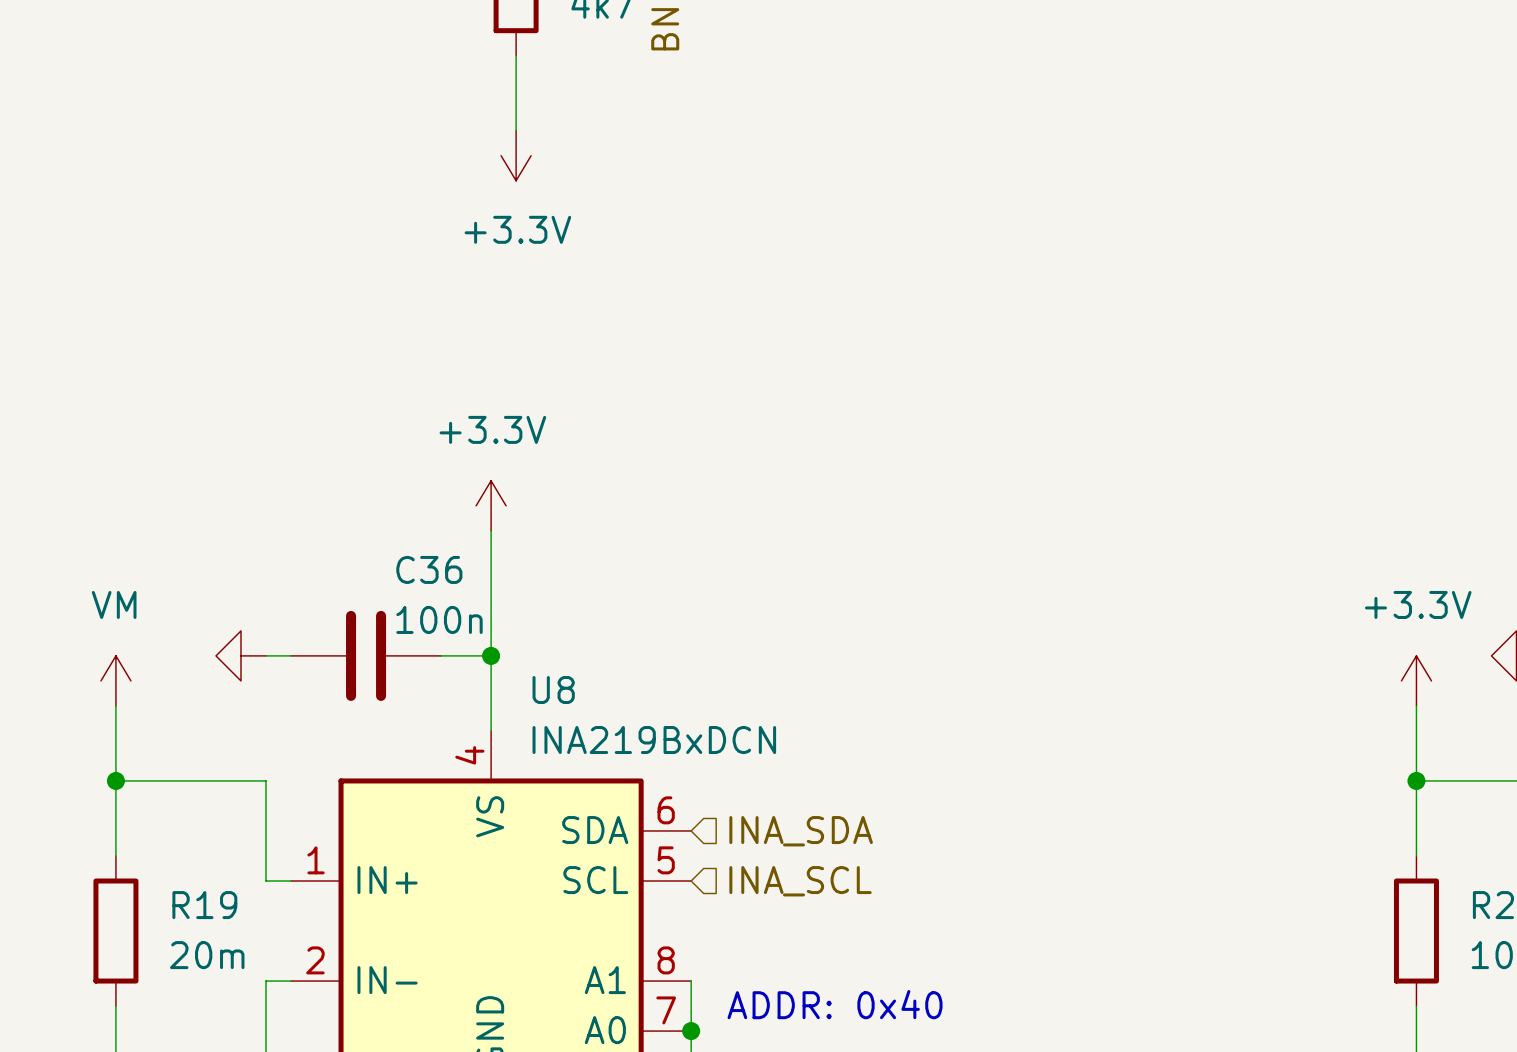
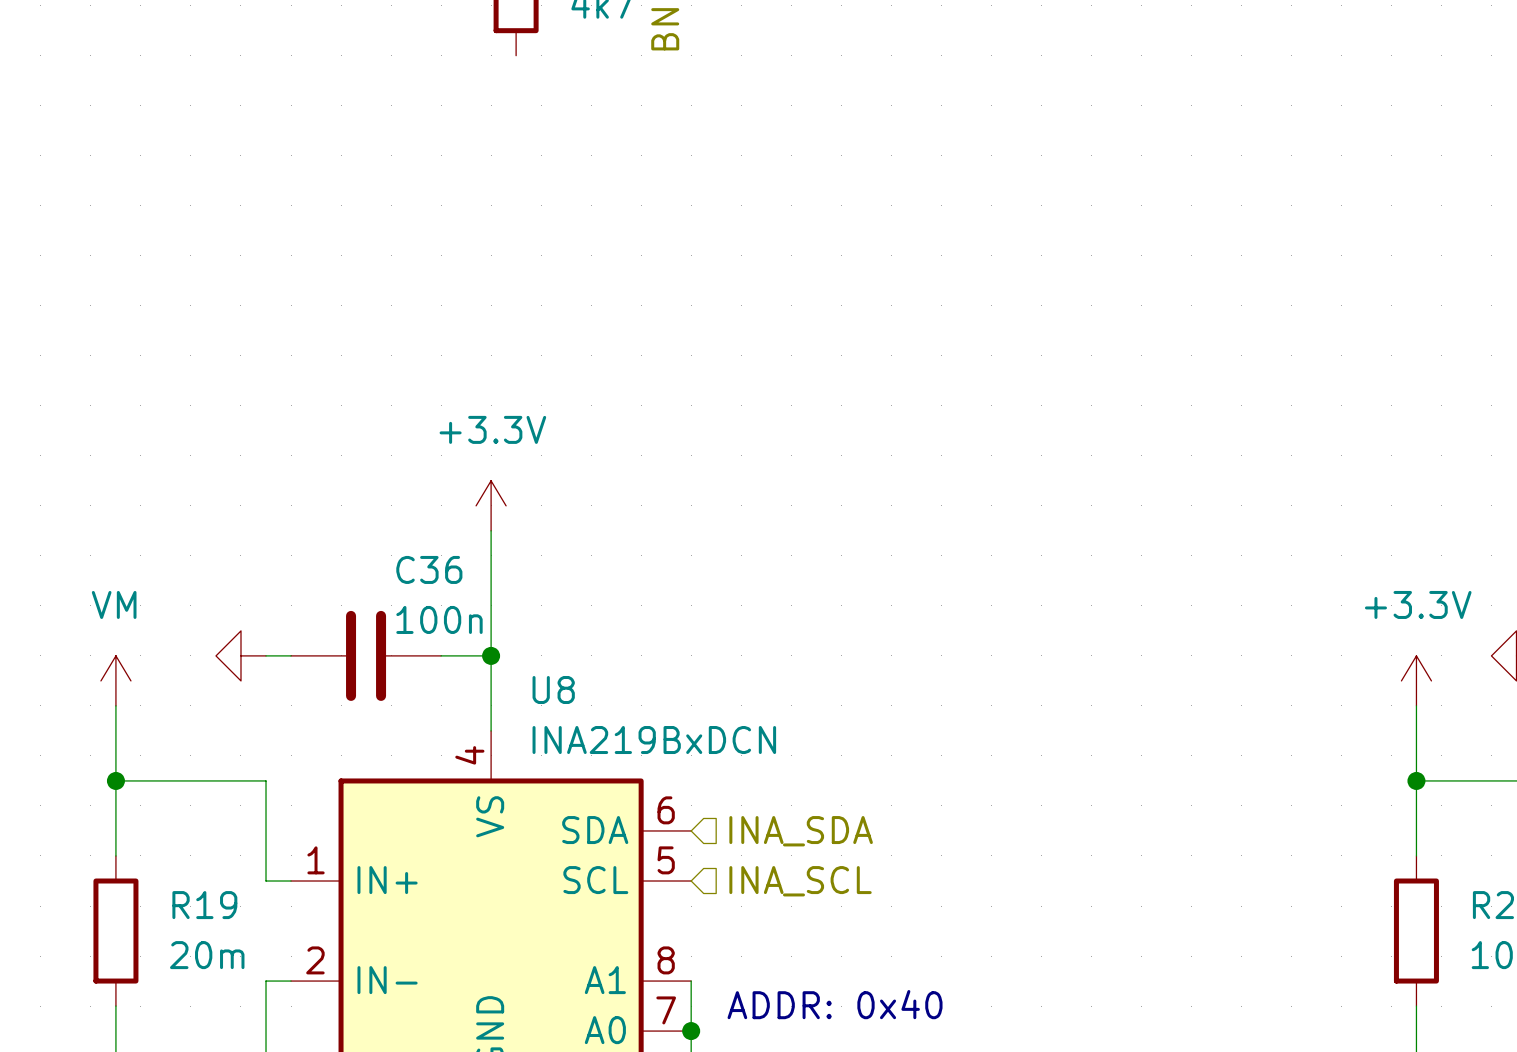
wire: (516, 55) (516, 130) -> none
power symbol: +3.3V (516, 155) -> none

